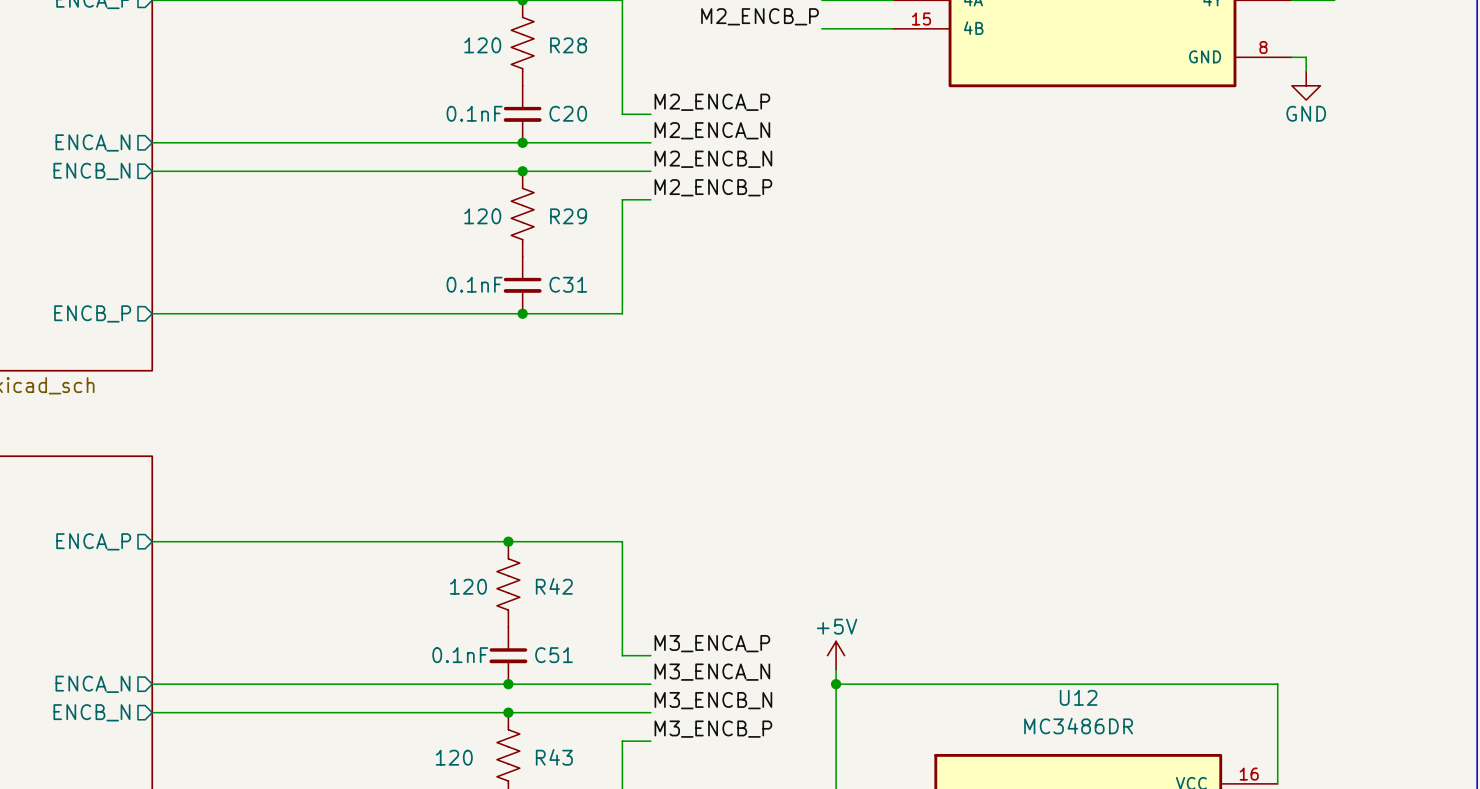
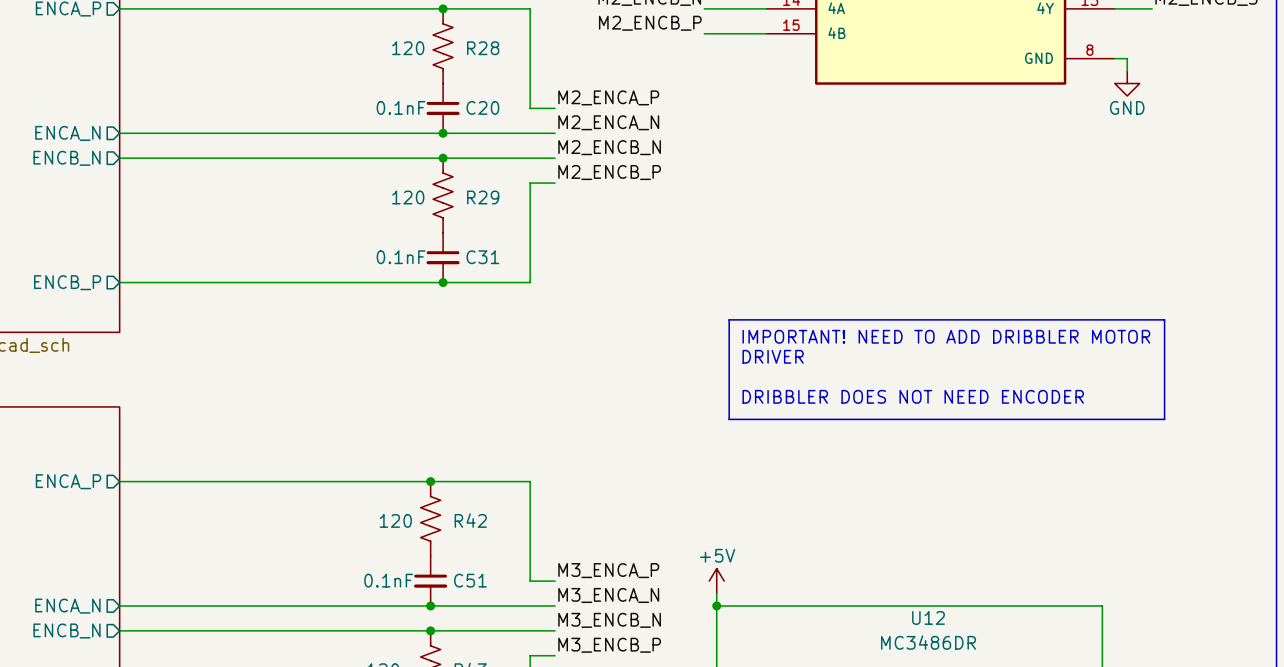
line: none -> (729, 319) (1164, 319) (1164, 419) (729, 419) (729, 319)
text: none -> IMPORTANT! NEED TO ADD DRIBBLER MOTOR (946, 336)
text: none -> DRIVER (773, 356)
text: none -> DRIBBLER DOES NOT NEED ENCODER (913, 396)

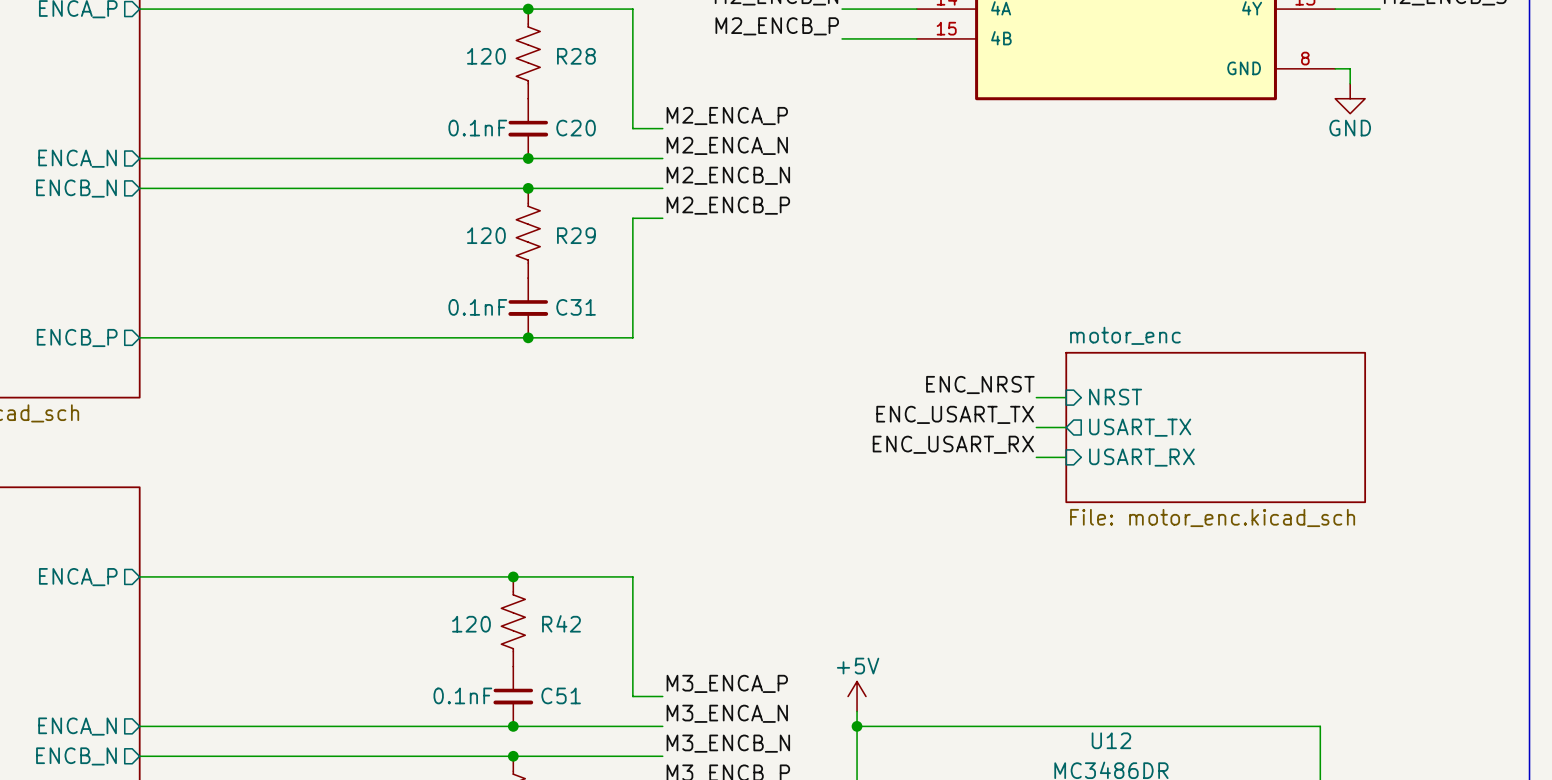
line: (729, 319) (1164, 319) (1164, 419) (729, 419) (729, 319) -> none
label: none -> ENC_NRST (980, 384)
sheet pin: none -> NRST (1115, 397)
wire: none -> (1036, 397) (1066, 397)
text: IMPORTANT! NEED TO ADD DRIBBLER MOTOR (946, 336) -> none
label: none -> ENC_USART_TX (955, 414)
text: DRIVER (773, 356) -> none
wire: none -> (1036, 427) (1066, 427)
sheet pin: none -> USART_TX (1140, 427)
sheet motor_enc: none -> File: motor_enc.kicad_sch (1215, 427)
label: none -> ENC_USART_RX (953, 444)
wire: none -> (1036, 457) (1066, 457)
sheet pin: none -> USART_RX (1141, 457)
text: DRIBBLER DOES NOT NEED ENCODER (913, 396) -> none

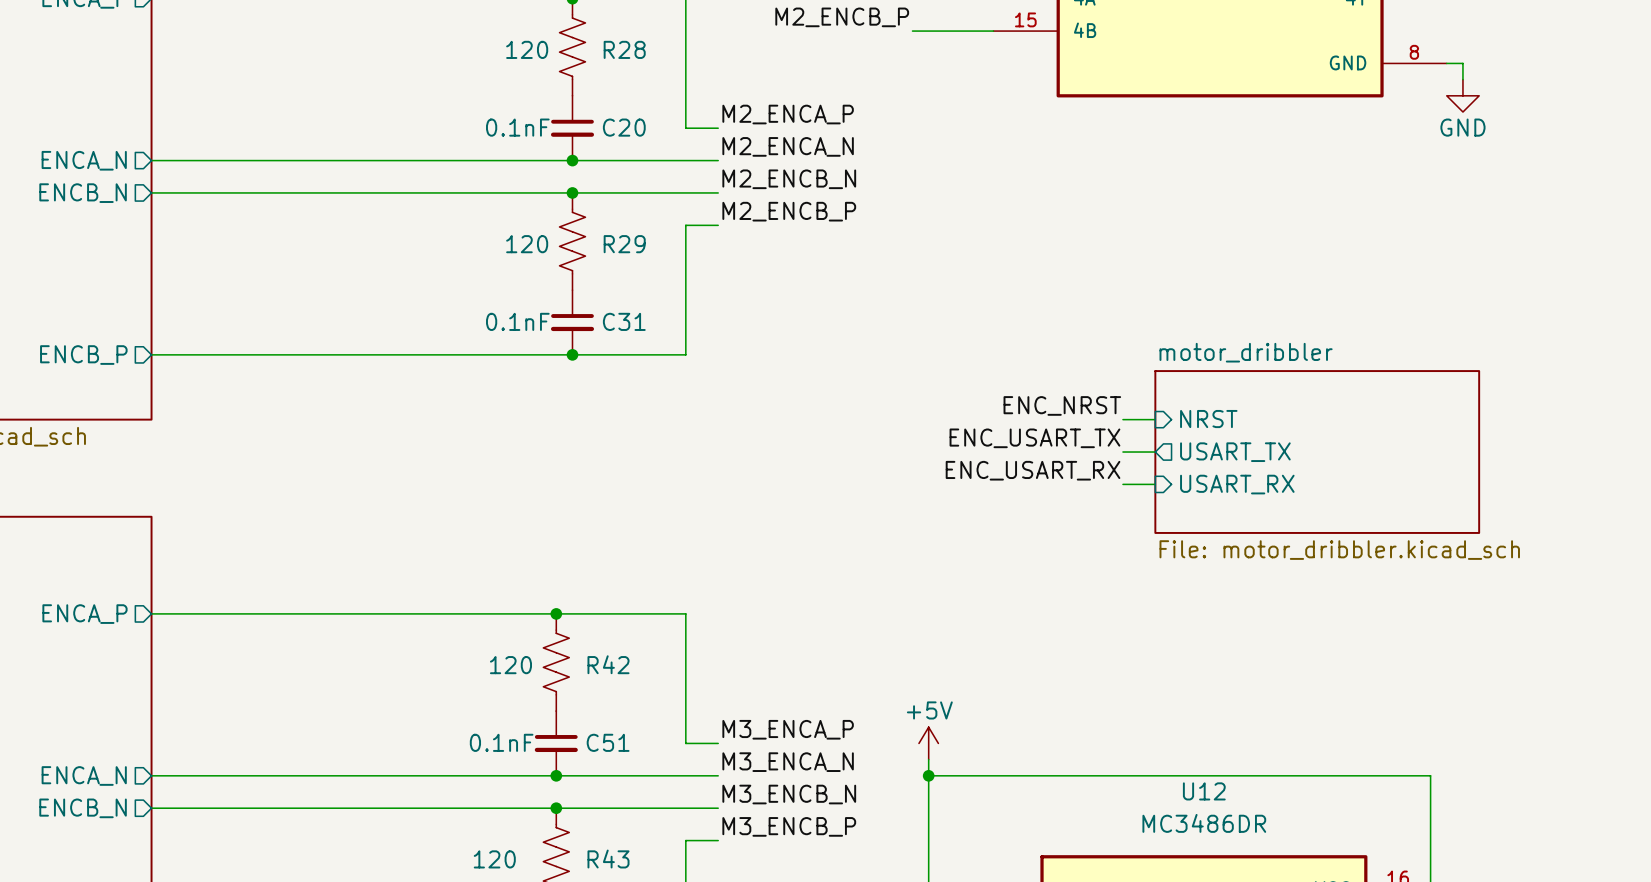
sheet motor_enc name: motor_enc (1125, 335) -> motor_dribbler (1246, 352)
sheet motor_enc value: File: motor_enc.kicad_sch (1212, 518) -> File: motor_dribbler.kicad_sch (1339, 550)

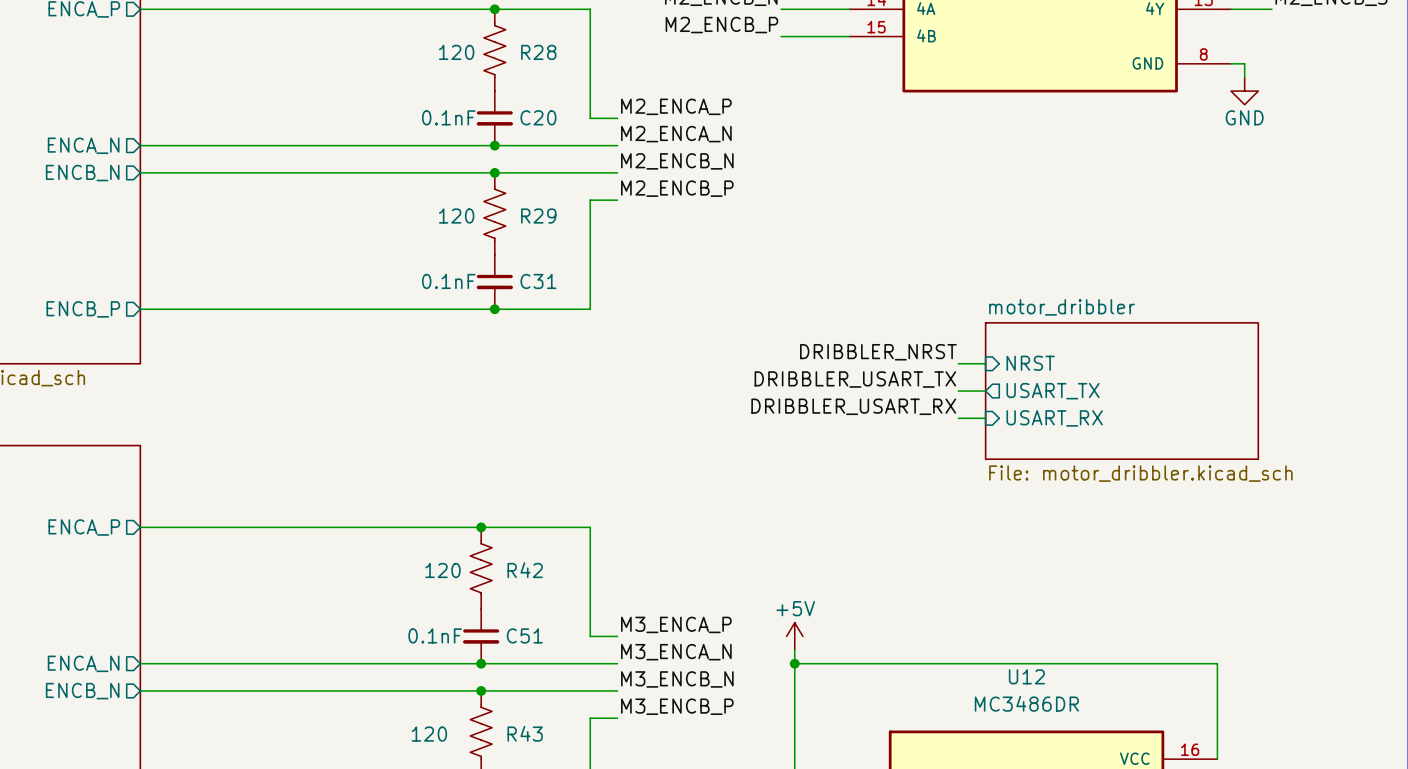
label: ENC_NRST (1062, 405) -> DRIBBLER_NRST (878, 352)
label: ENC_USART_TX (1034, 438) -> DRIBBLER_USART_TX (855, 379)
label: ENC_USART_RX (1033, 470) -> DRIBBLER_USART_RX (853, 406)

